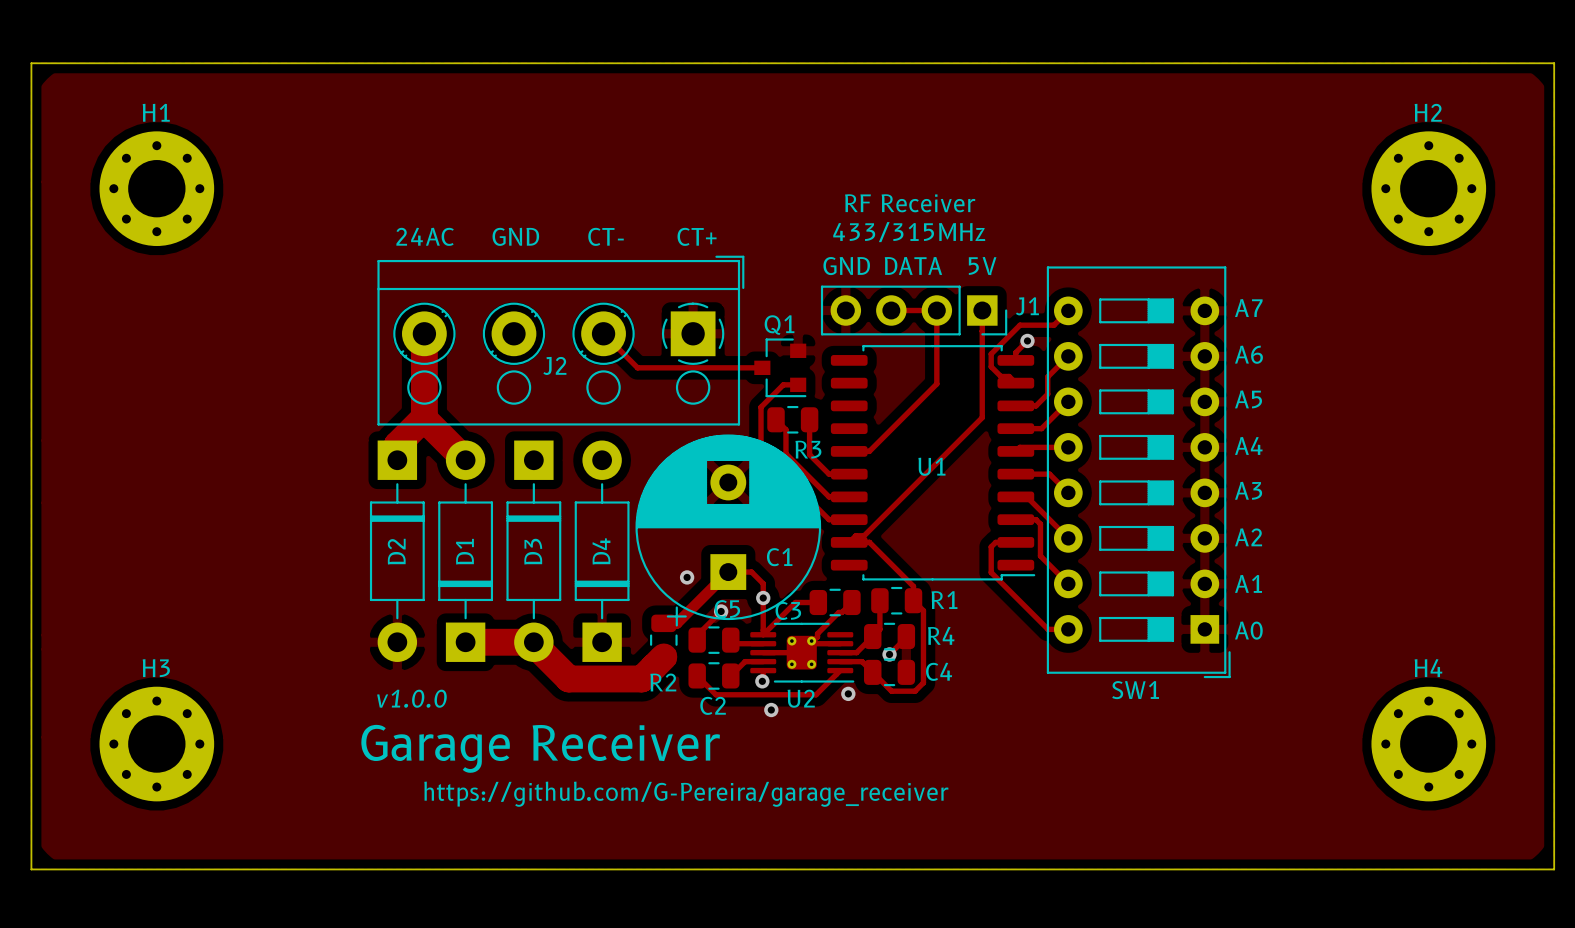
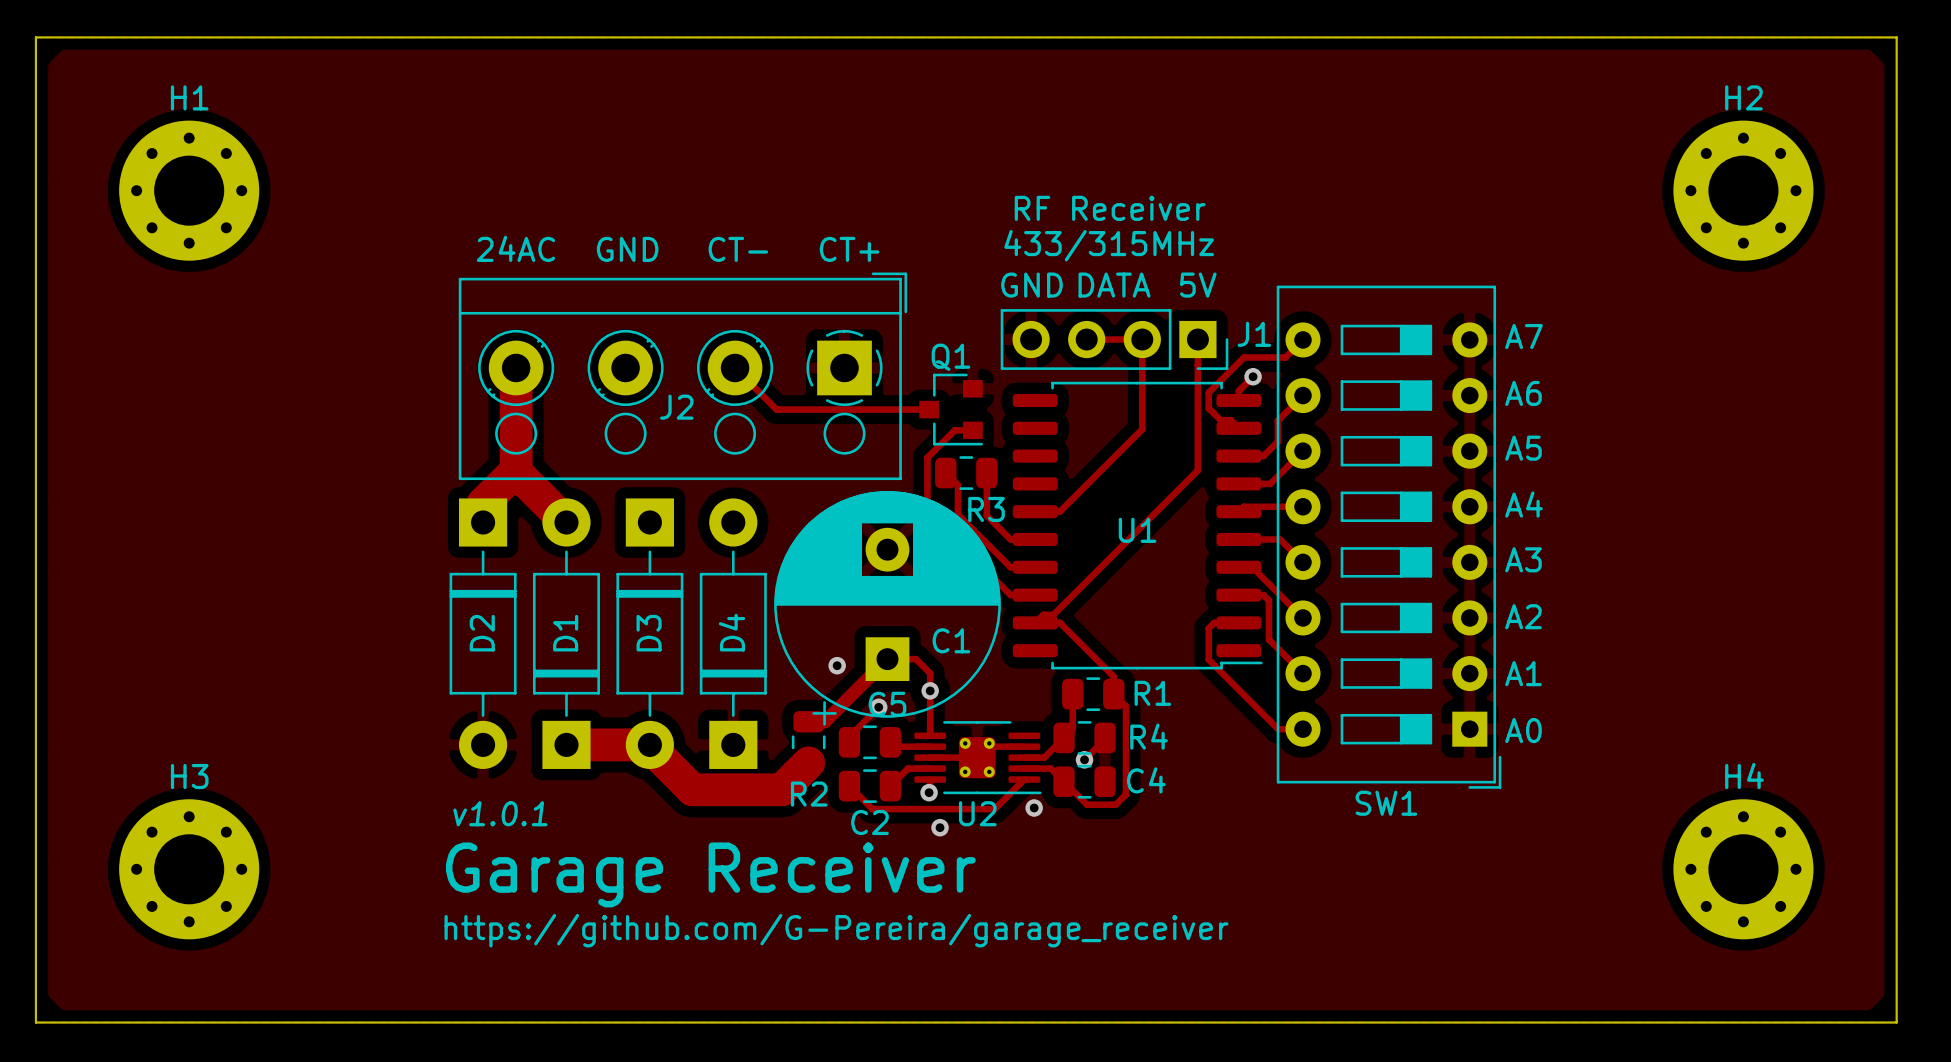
track: (818, 602) (795, 602) (763, 634) -> none
C3: (835, 602) -> none
track: (851, 602) (841, 612) (838, 612) (817, 633) (817, 636) (810, 643) -> none
text: v1.0.0 (411, 698) -> v1.0.1 (500, 813)

